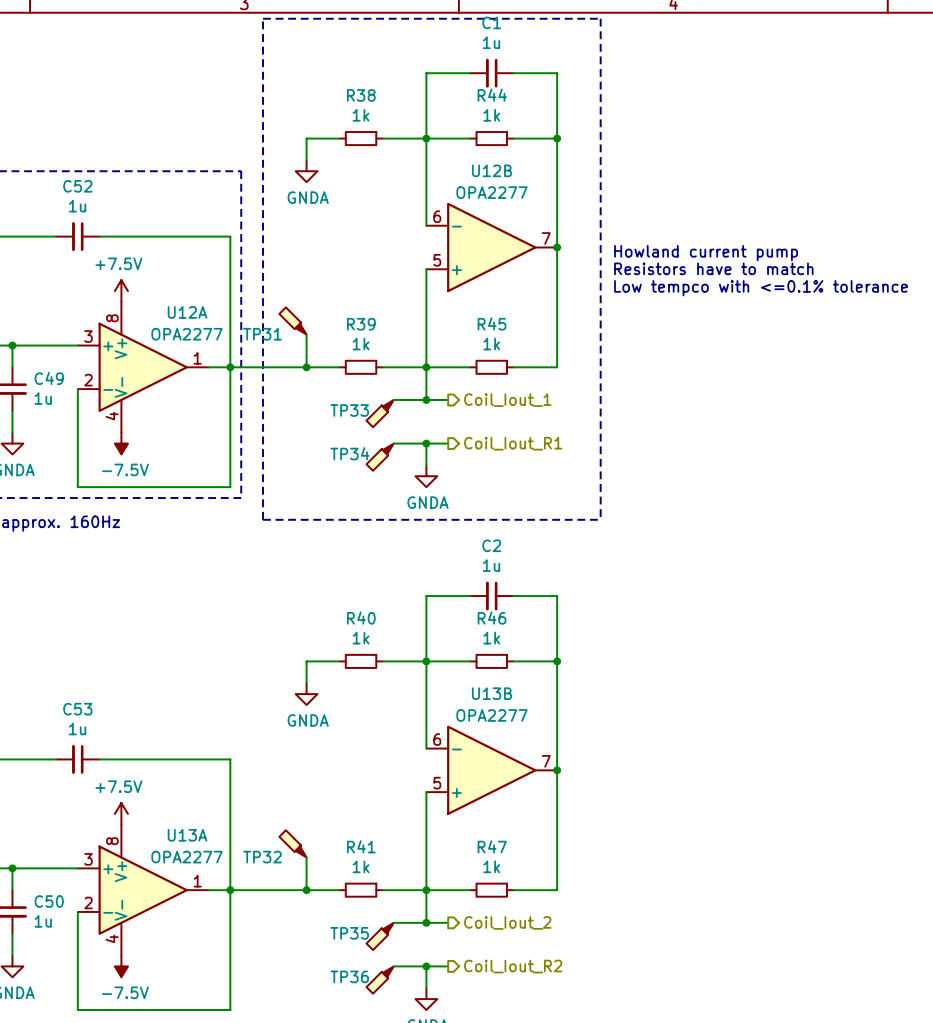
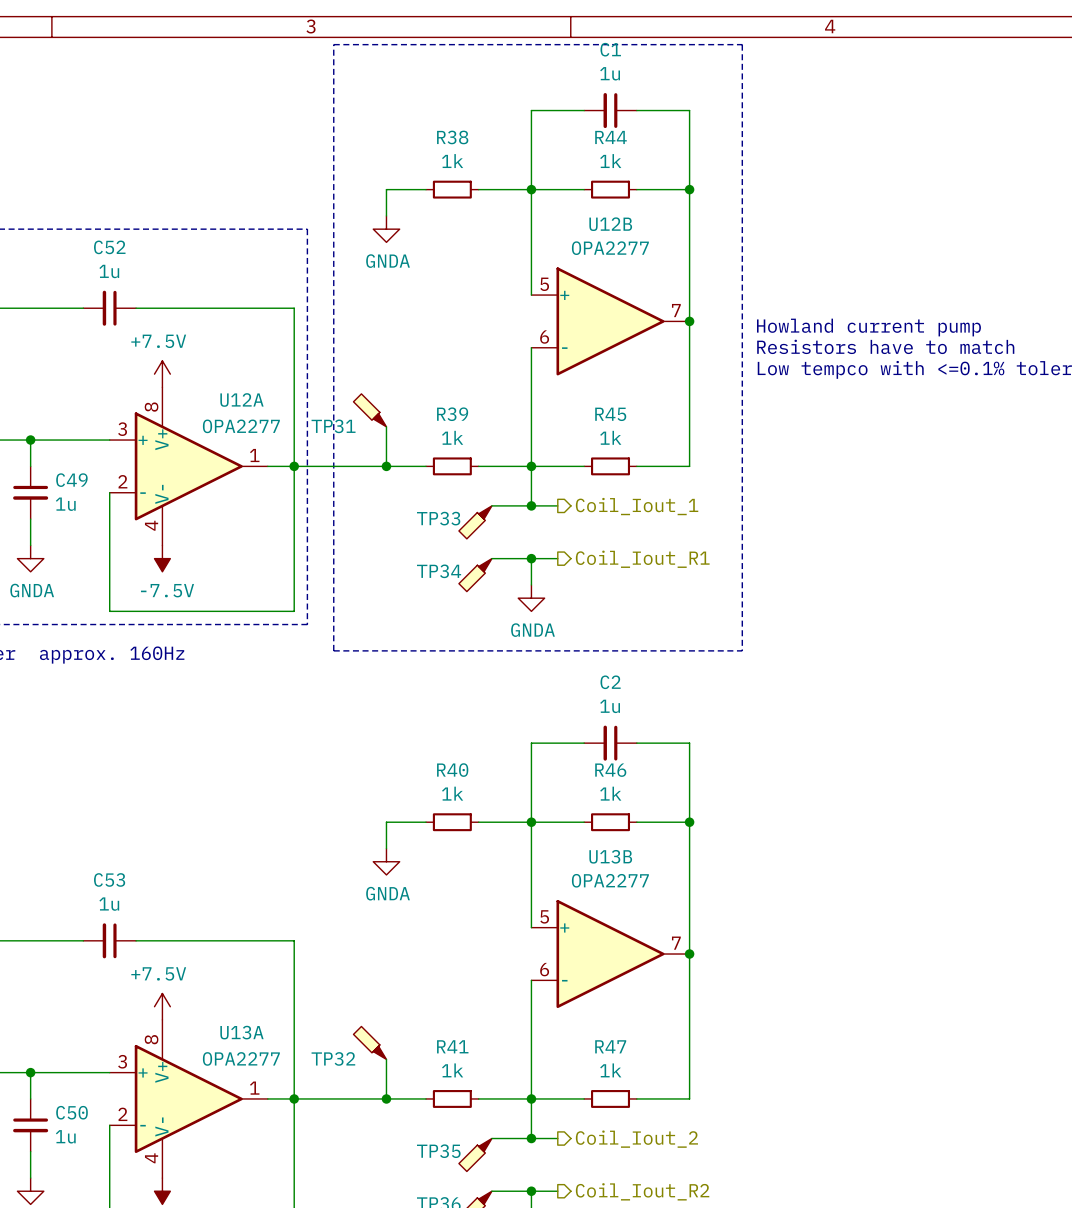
U12B flip: as is (491, 247) -> up-down (610, 321)
U13B flip: as is (491, 770) -> up-down (610, 954)

